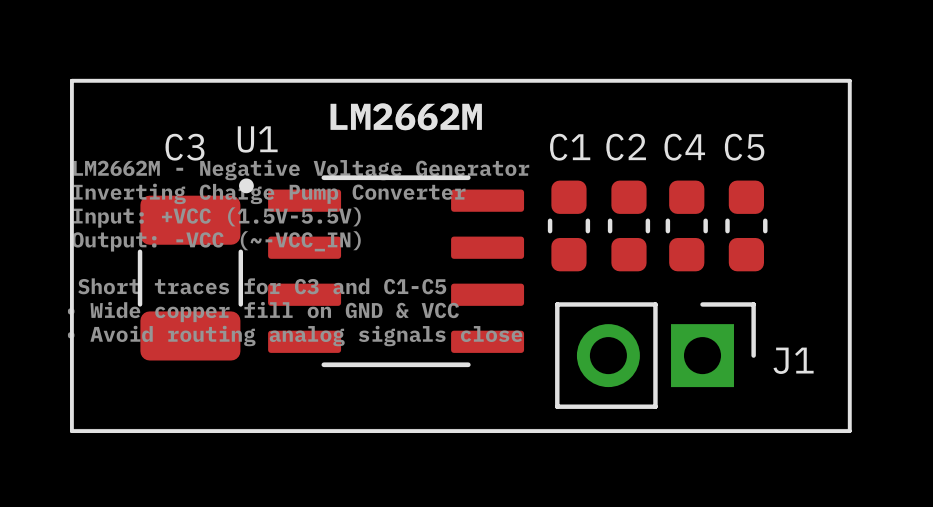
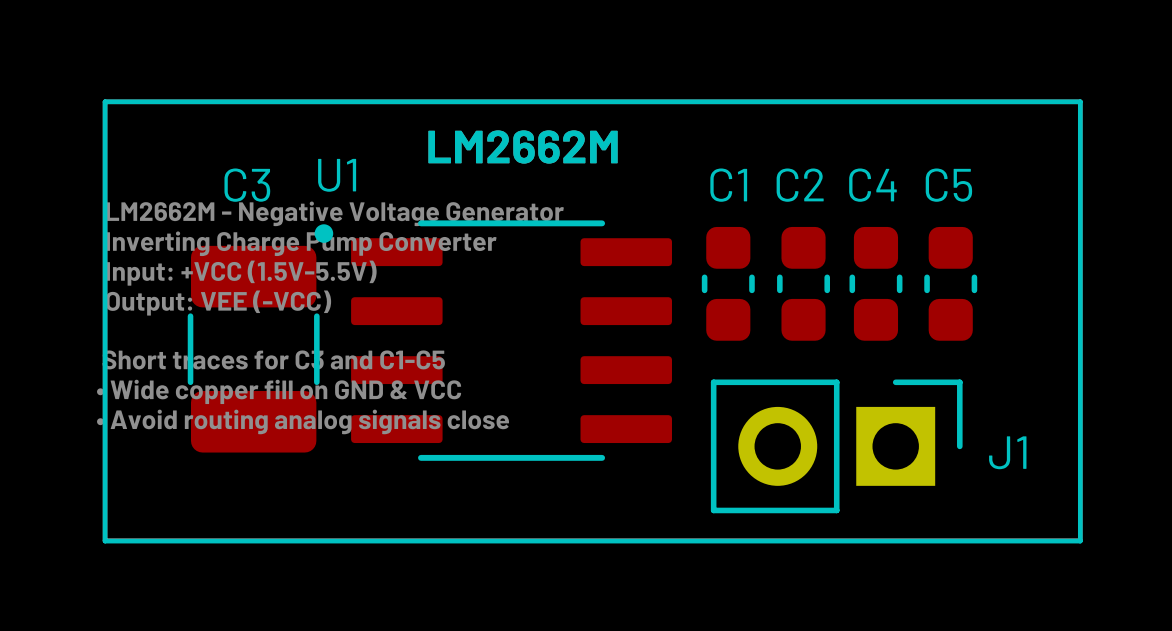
text: Output: -VCC (~-VCC_IN) (216, 241) -> Output: VEE (-VCC) (218, 303)

